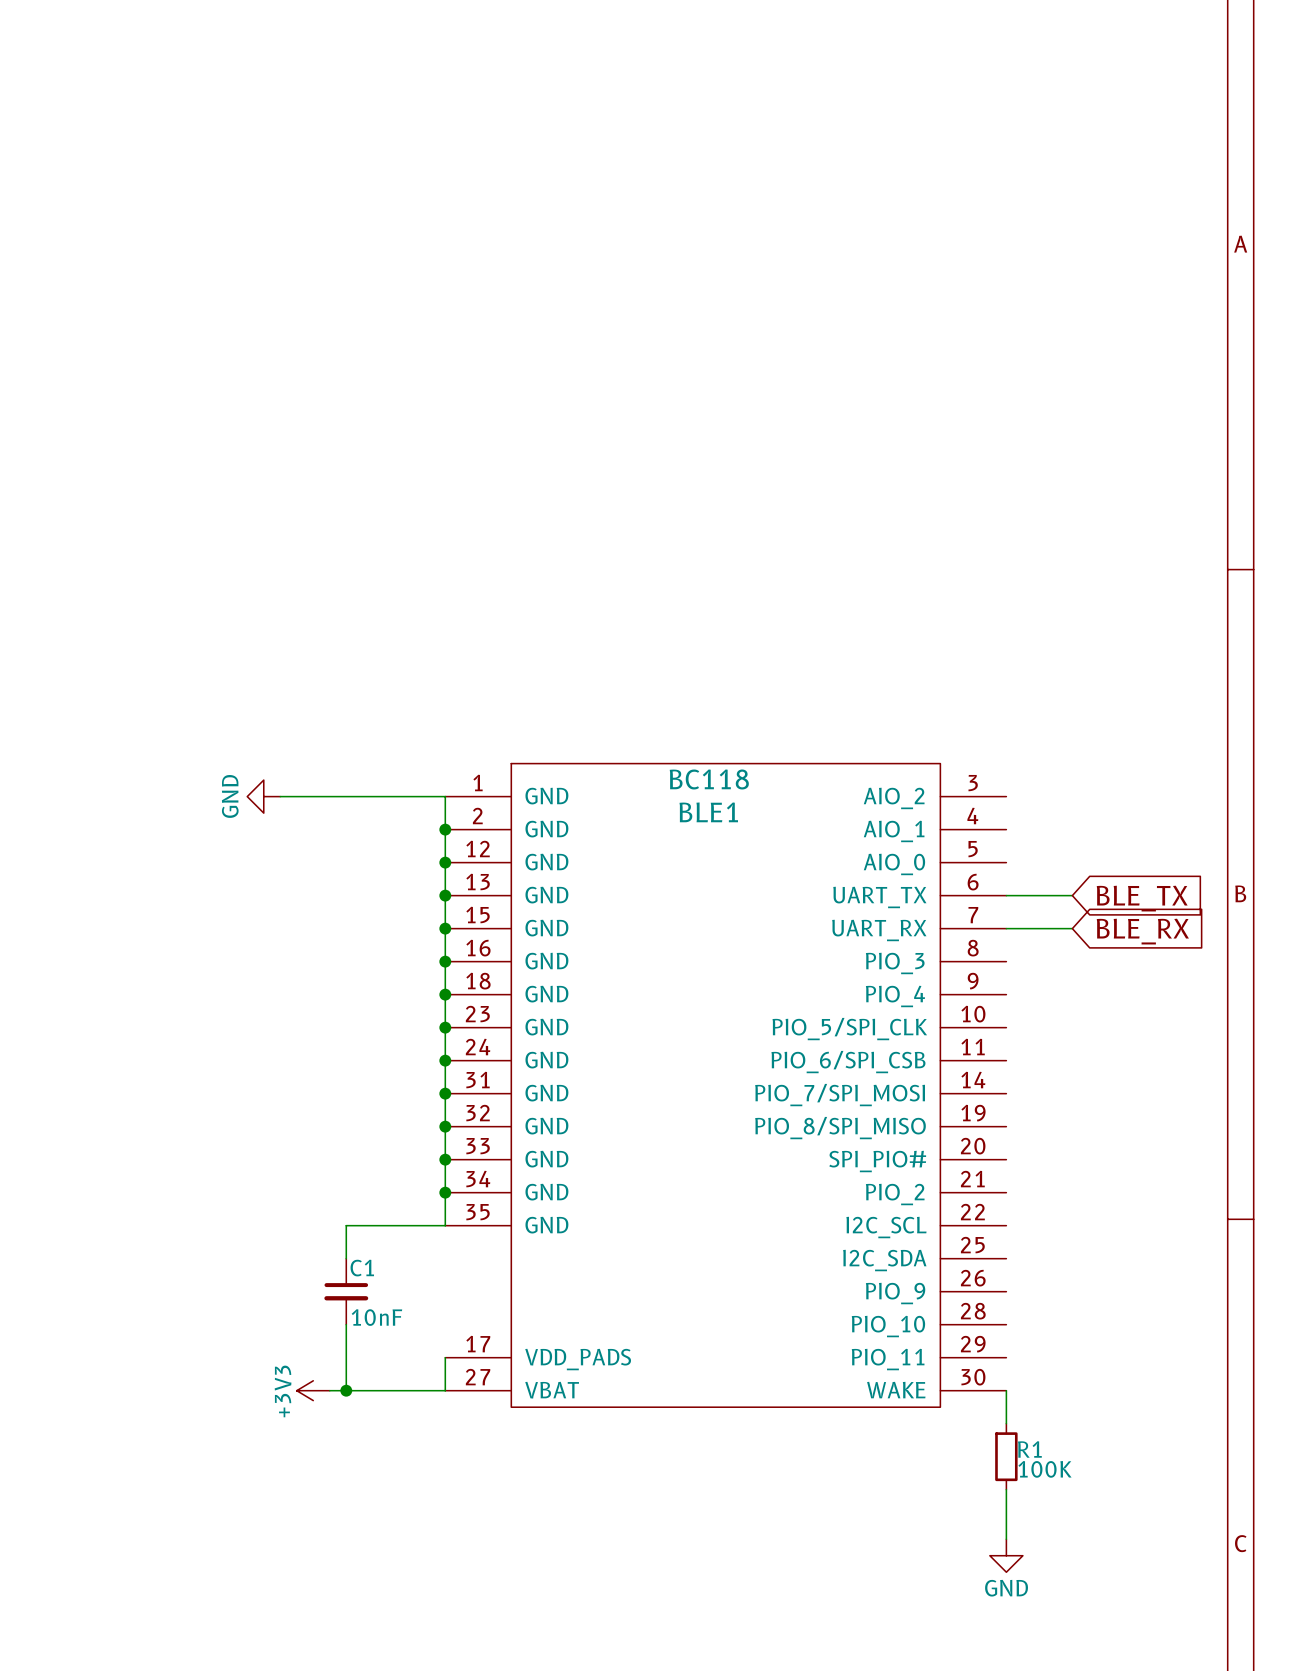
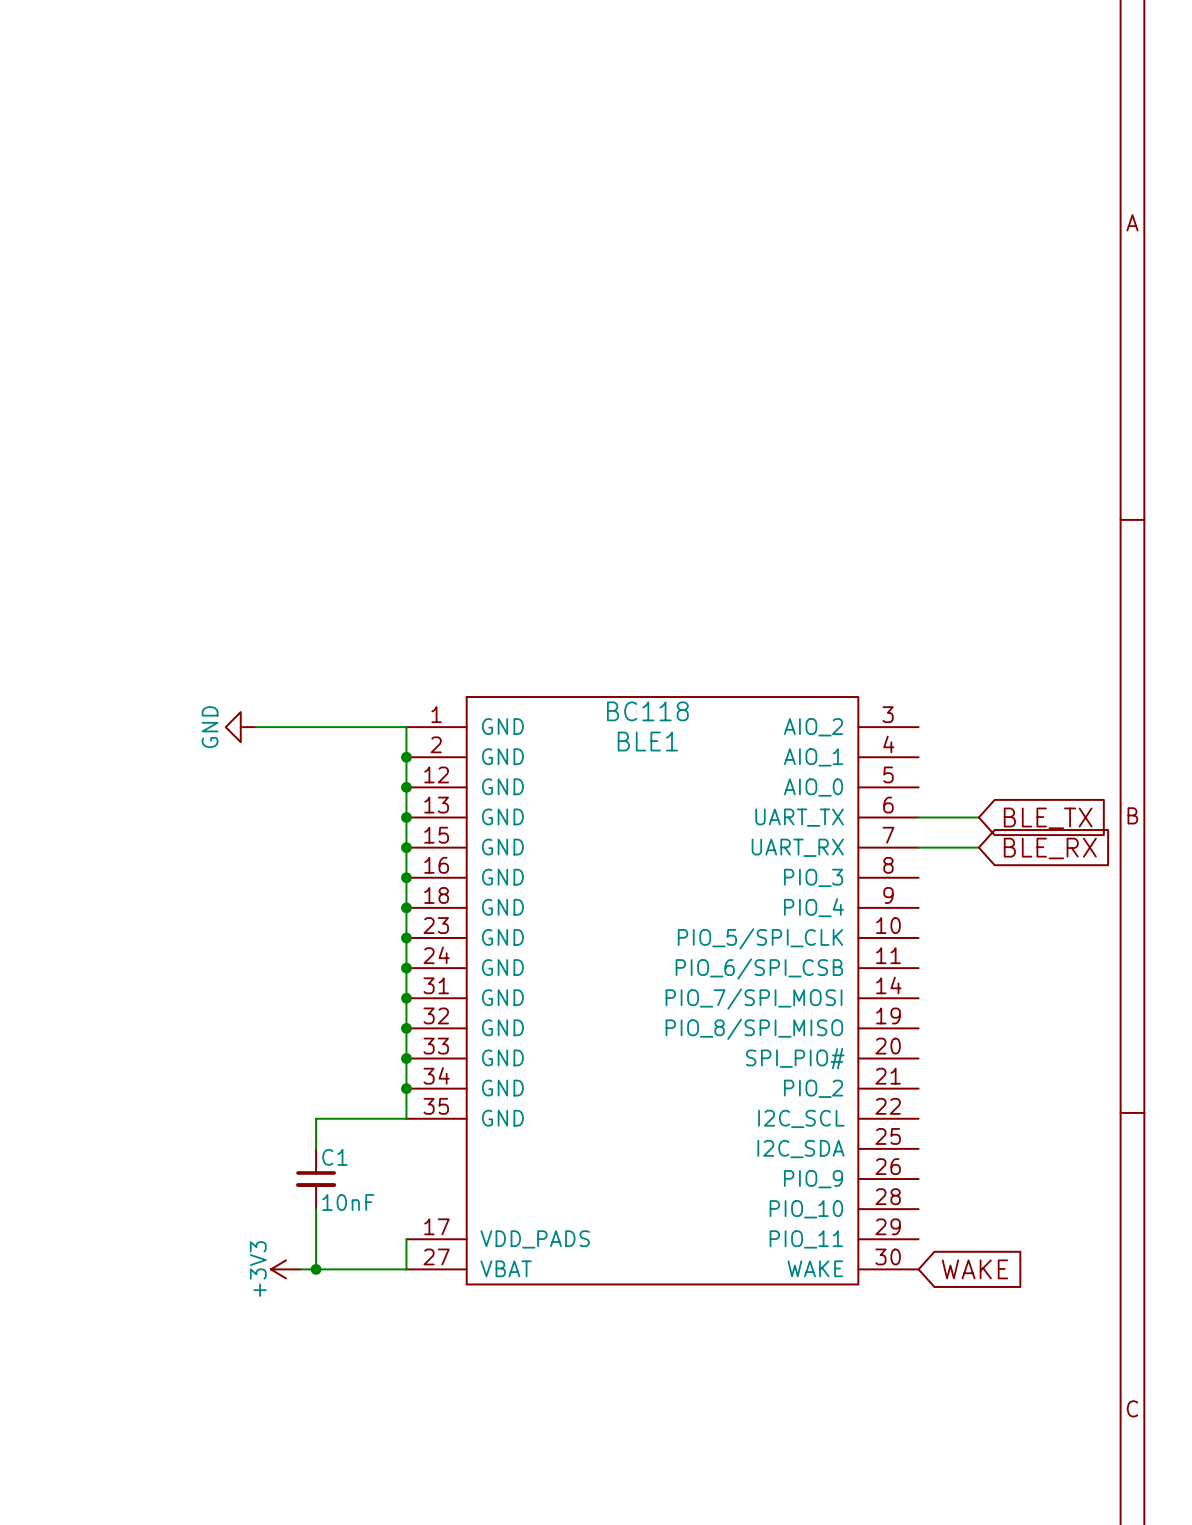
wire: (1006, 1390) (1006, 1423) -> none
global label: none -> WAKE (974, 1269)
R1: 100K (1006, 1456) -> none
wire: (1006, 1489) (1006, 1539) -> none
power symbol: GND (1006, 1555) -> none

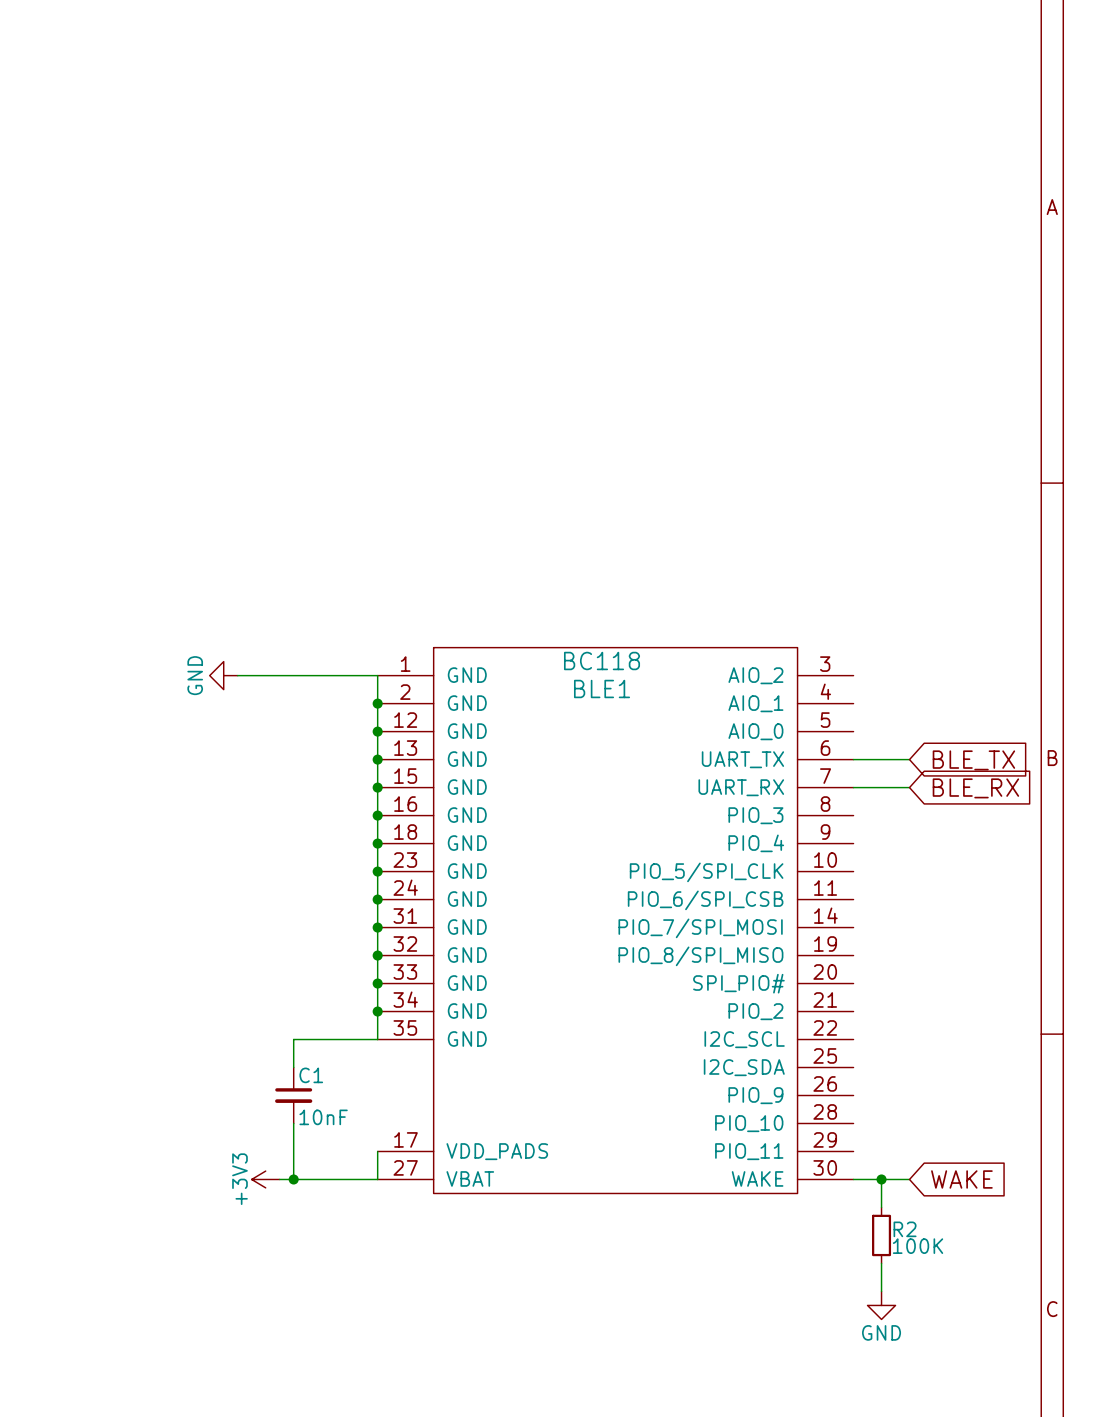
wire: none -> (853, 1179) (909, 1179)
wire: none -> (881, 1179) (881, 1207)
junction: none -> (881, 1179)
global label position: WAKE (974, 1269) -> WAKE (961, 1179)
R2: none -> 100K (881, 1235)
wire: none -> (881, 1263) (881, 1291)
power symbol: none -> GND (881, 1305)

